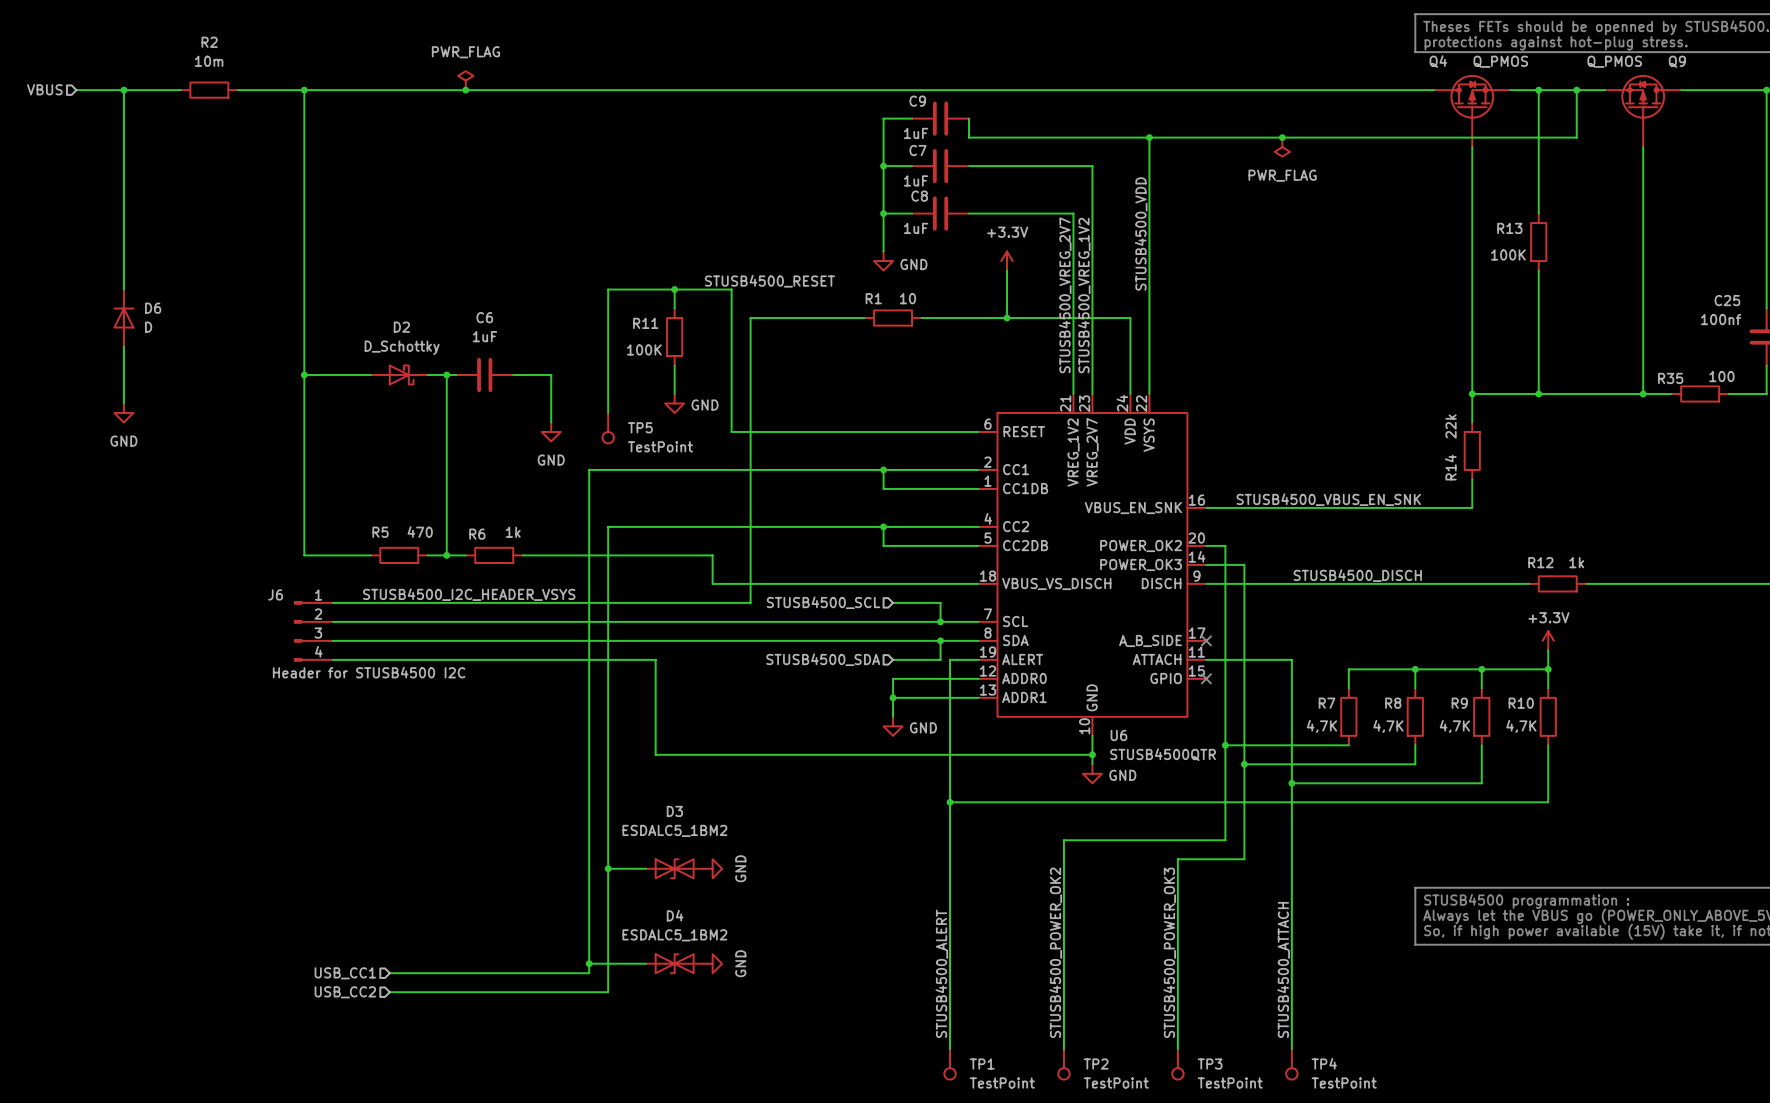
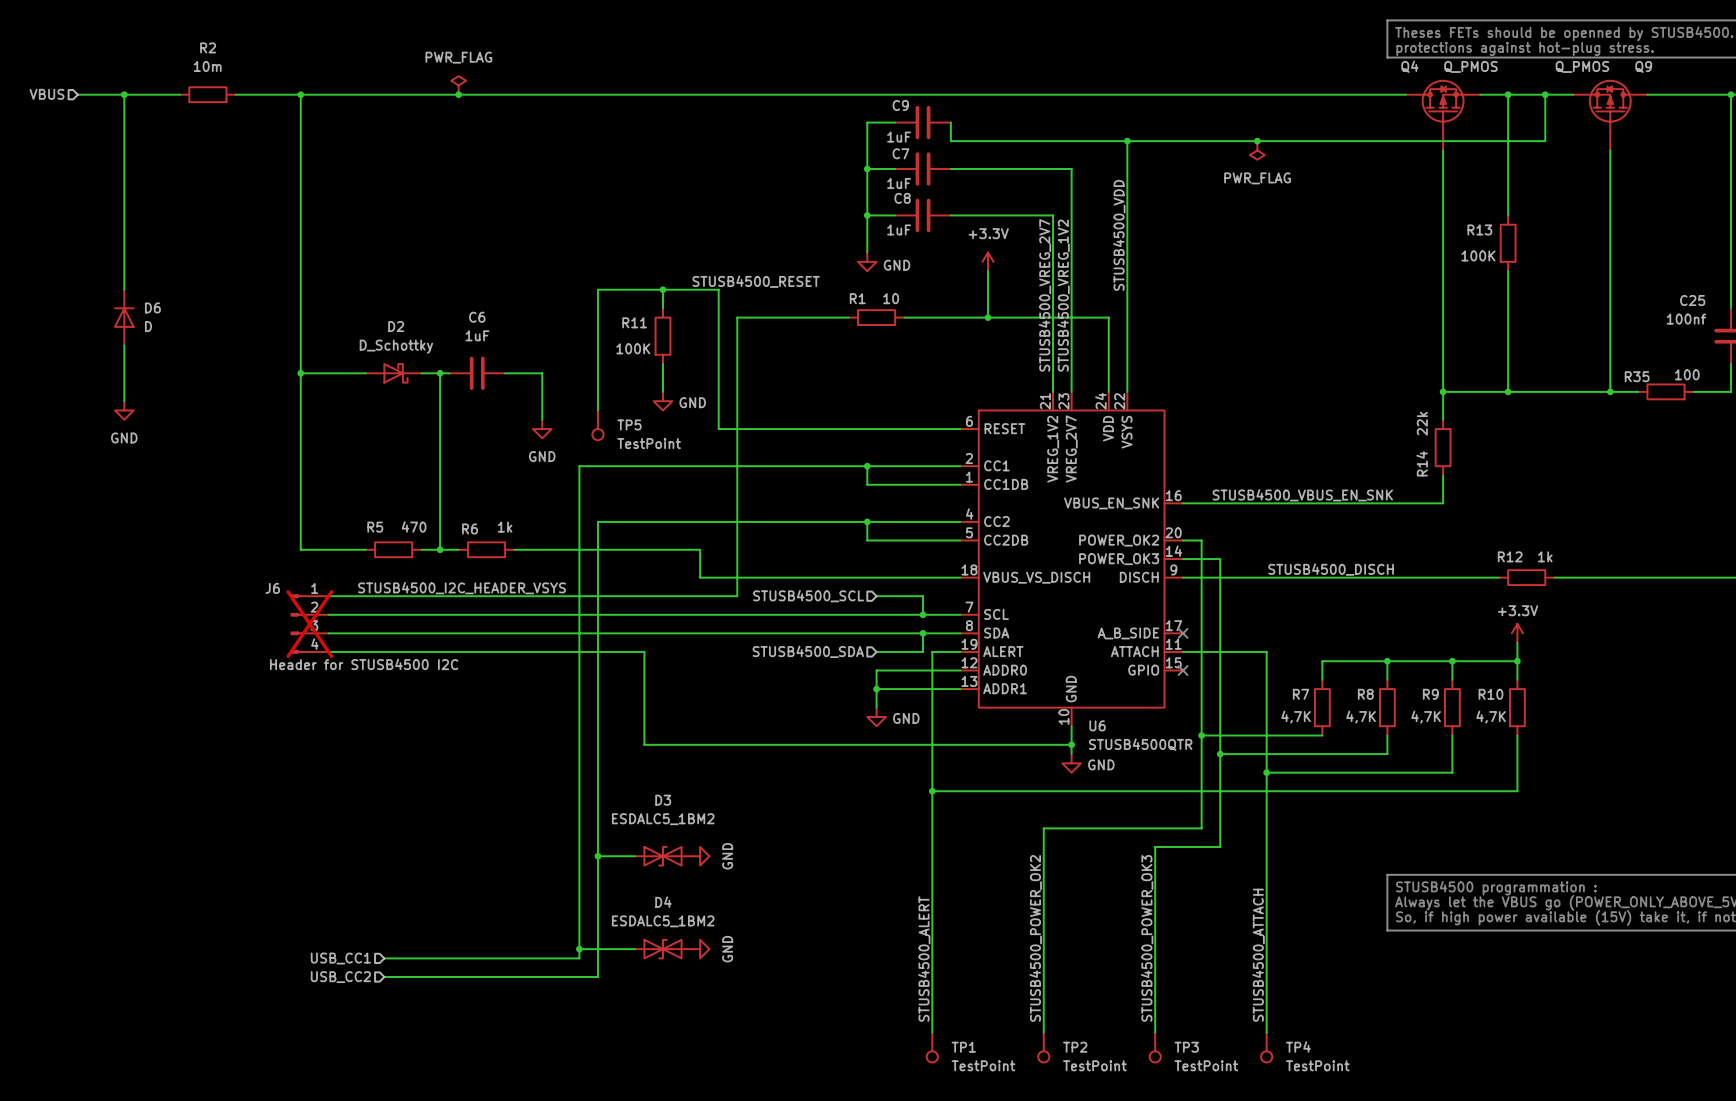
J6 do-not-place cross: none -> (309, 624)

